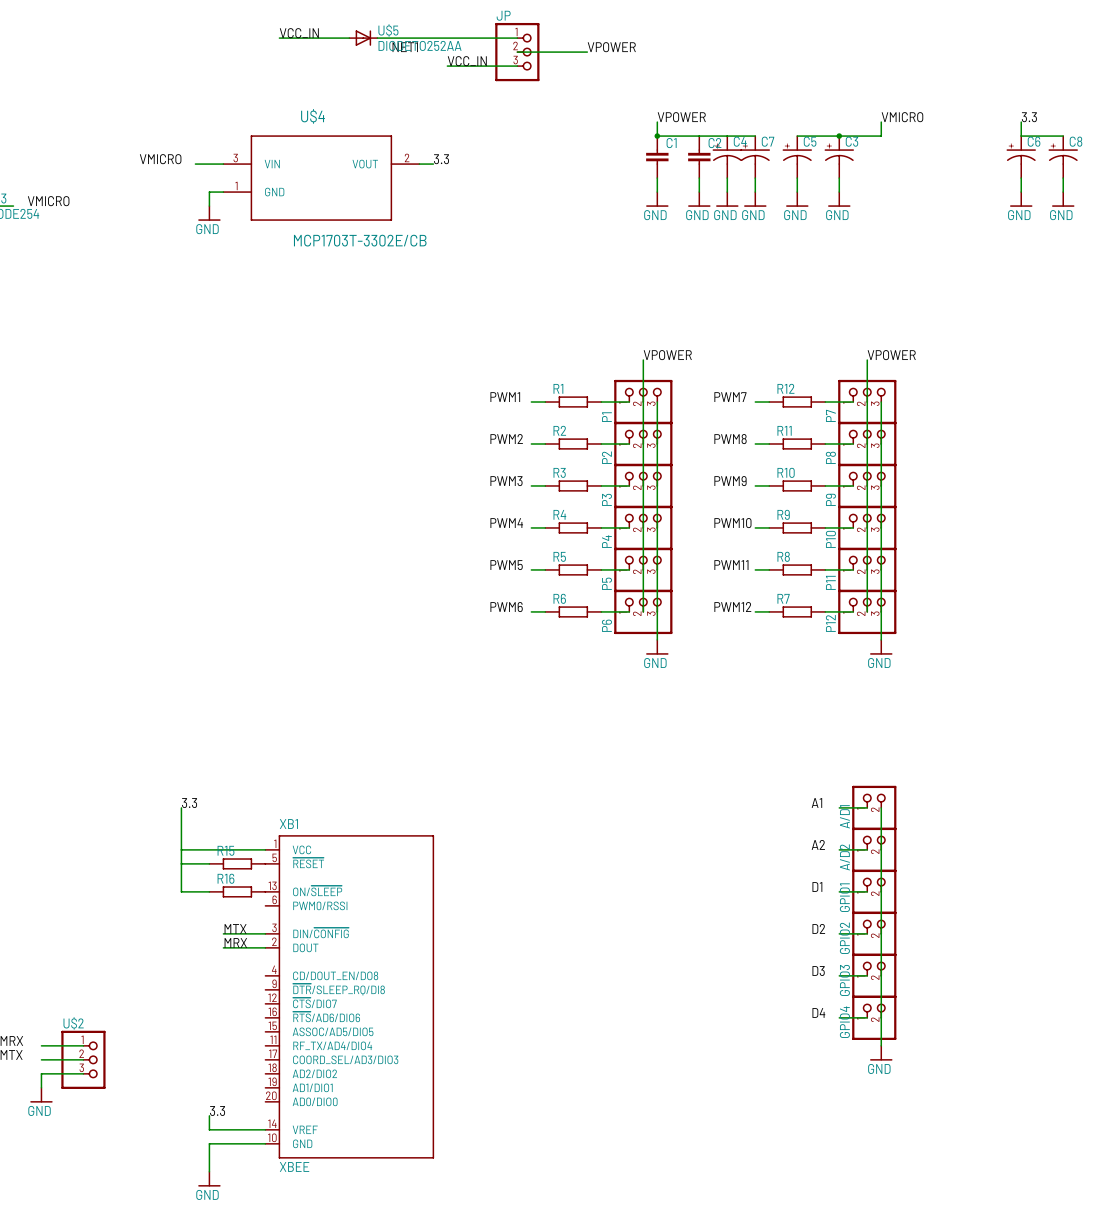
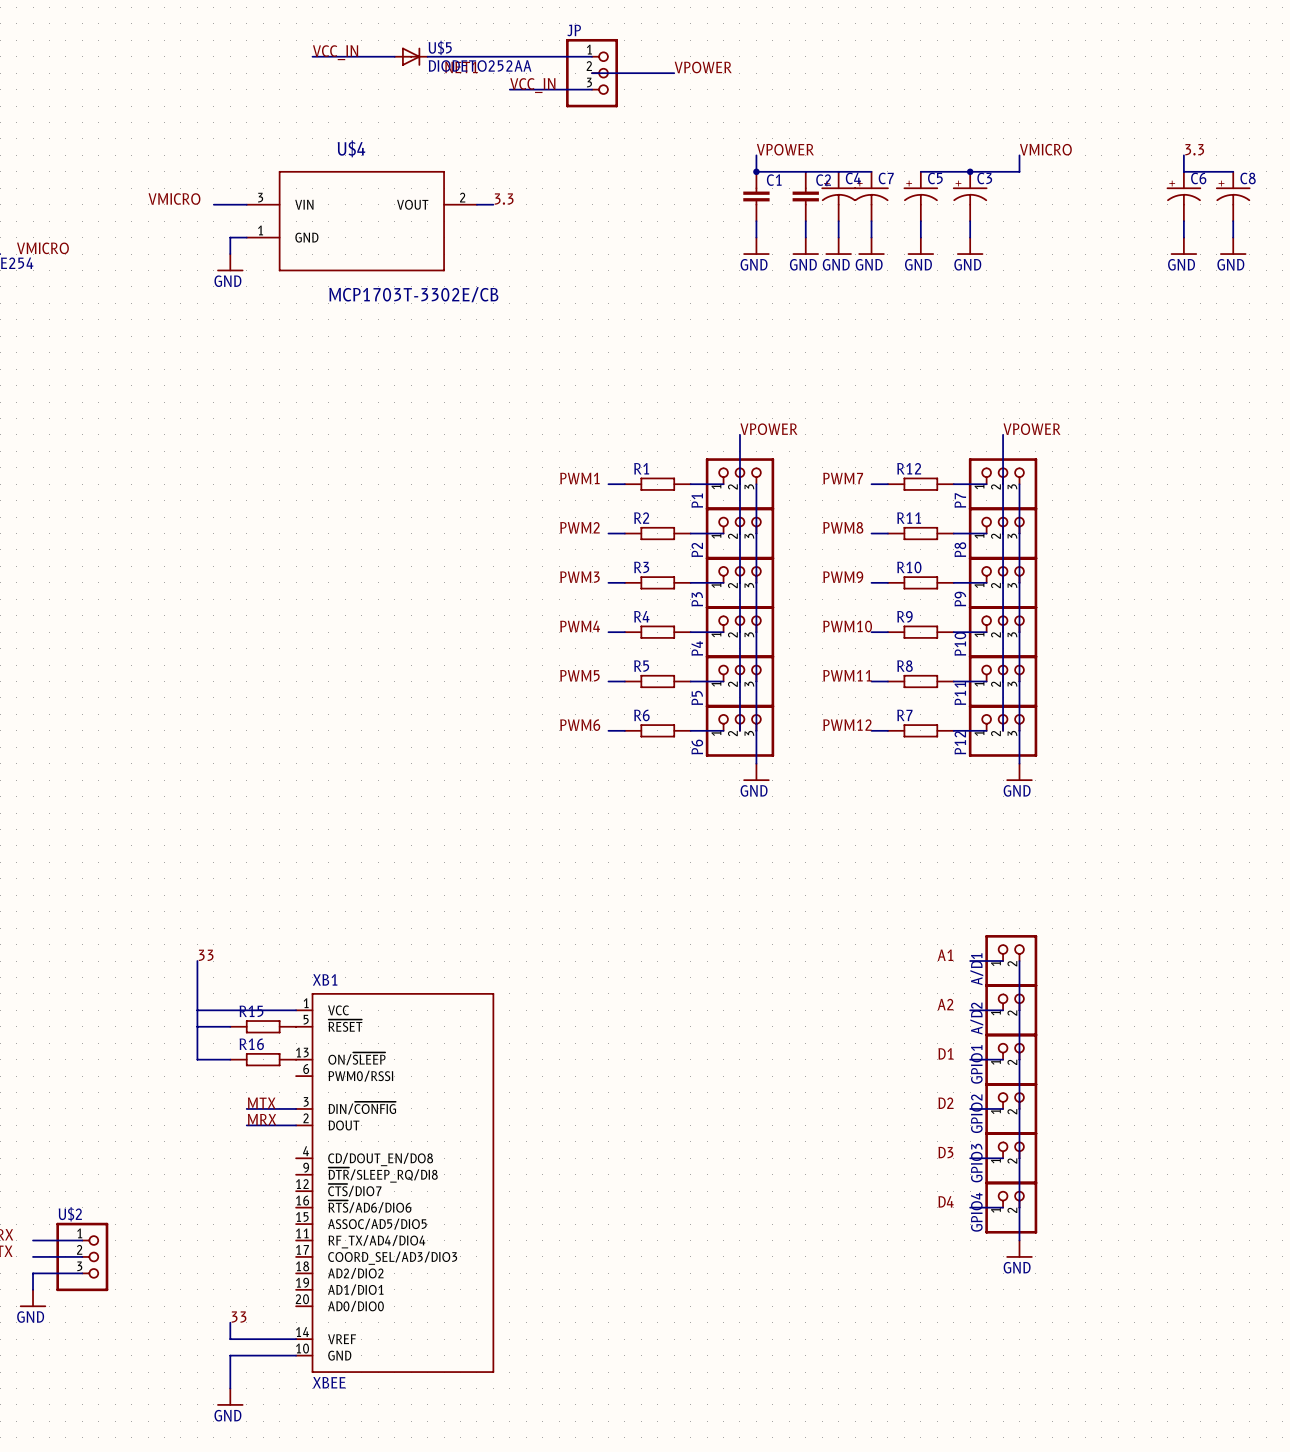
label: 3.3 (189, 803) -> 33 (206, 955)
label: 3.3 (217, 1111) -> 33 (239, 1317)

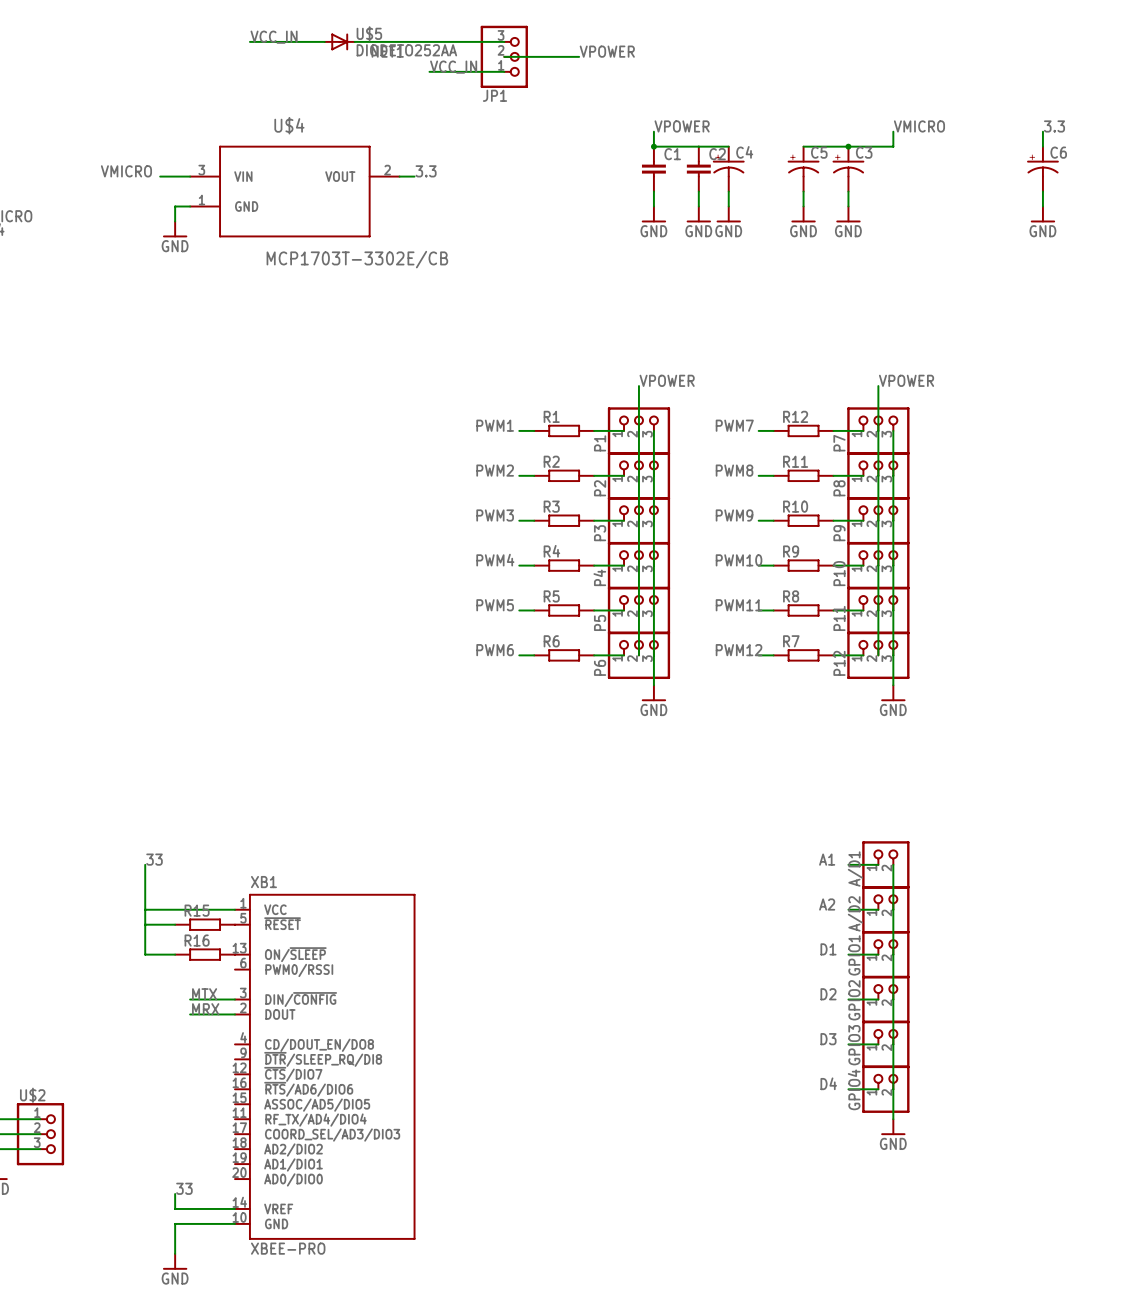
JP name: JP (574, 30) -> JP1 (494, 95)
JP flip: as is (592, 73) -> up-down (504, 56)
wire: (838, 171) (871, 171) -> none
wire: (1183, 171) (1233, 171) -> none
C7: (871, 196) -> none
C8: (1233, 196) -> none
wire: (871, 221) (871, 237) -> none
wire: (1233, 221) (1233, 237) -> none
power symbol: GND (871, 246) -> none
power symbol: GND (1233, 246) -> none
XB1 value: XBEE (329, 1382) -> XBEE-PRO (288, 1248)

